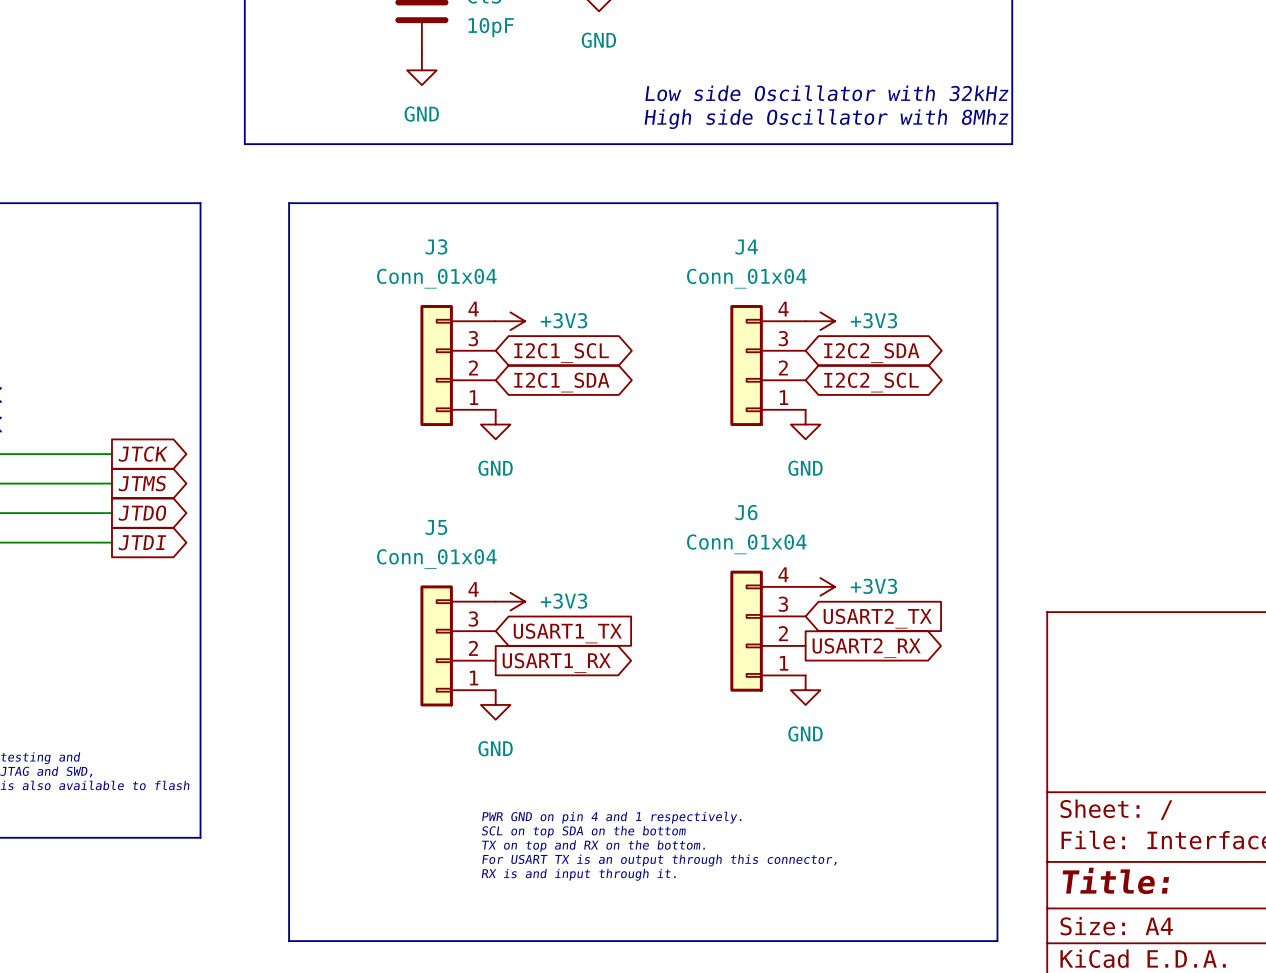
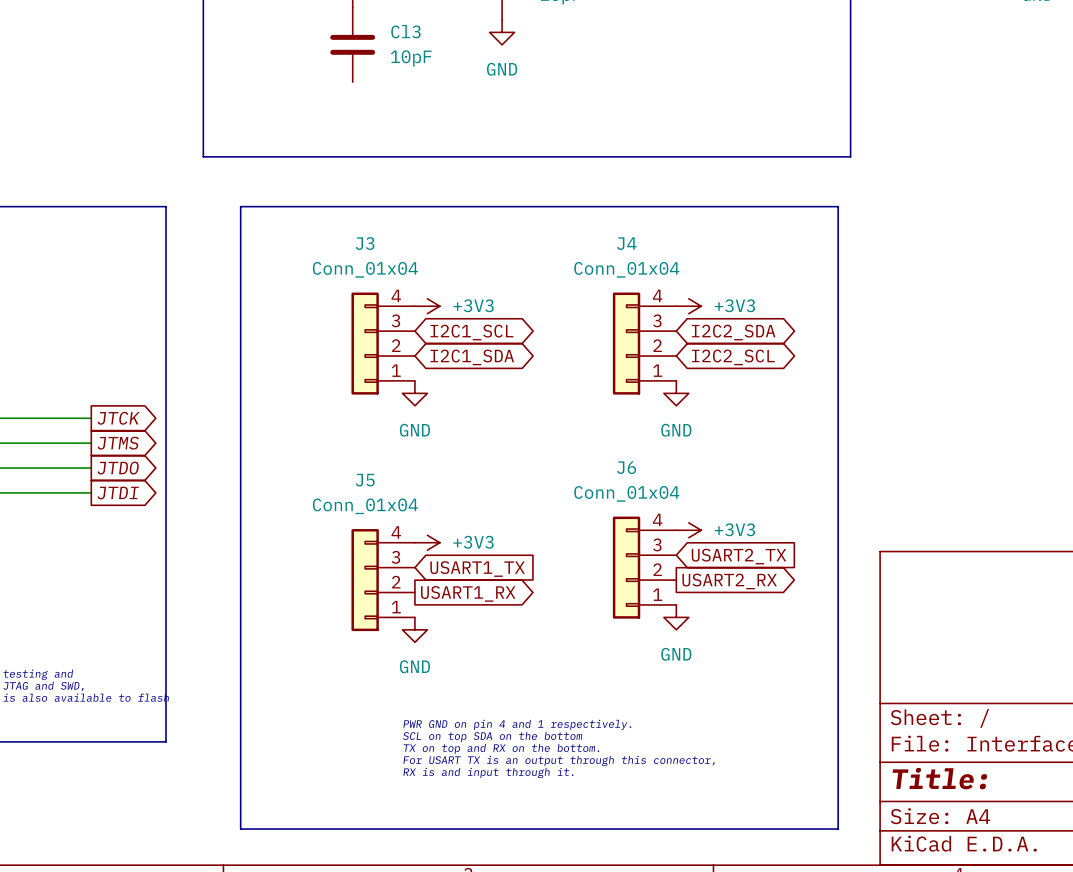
power symbol: GND (421, 70) -> none
text: Low side Oscillator with 32kHz (826, 93) -> none
text: High side Oscillator with 8Mhz (826, 119) -> none

